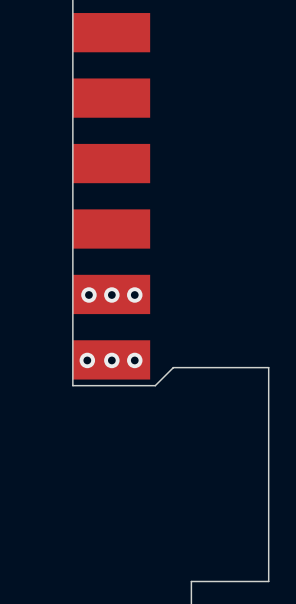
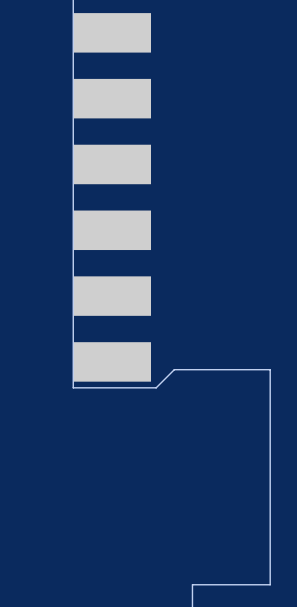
via: (88, 295) -> none
via: (111, 295) -> none
via: (134, 295) -> none
via: (87, 360) -> none
via: (111, 360) -> none
via: (134, 360) -> none

